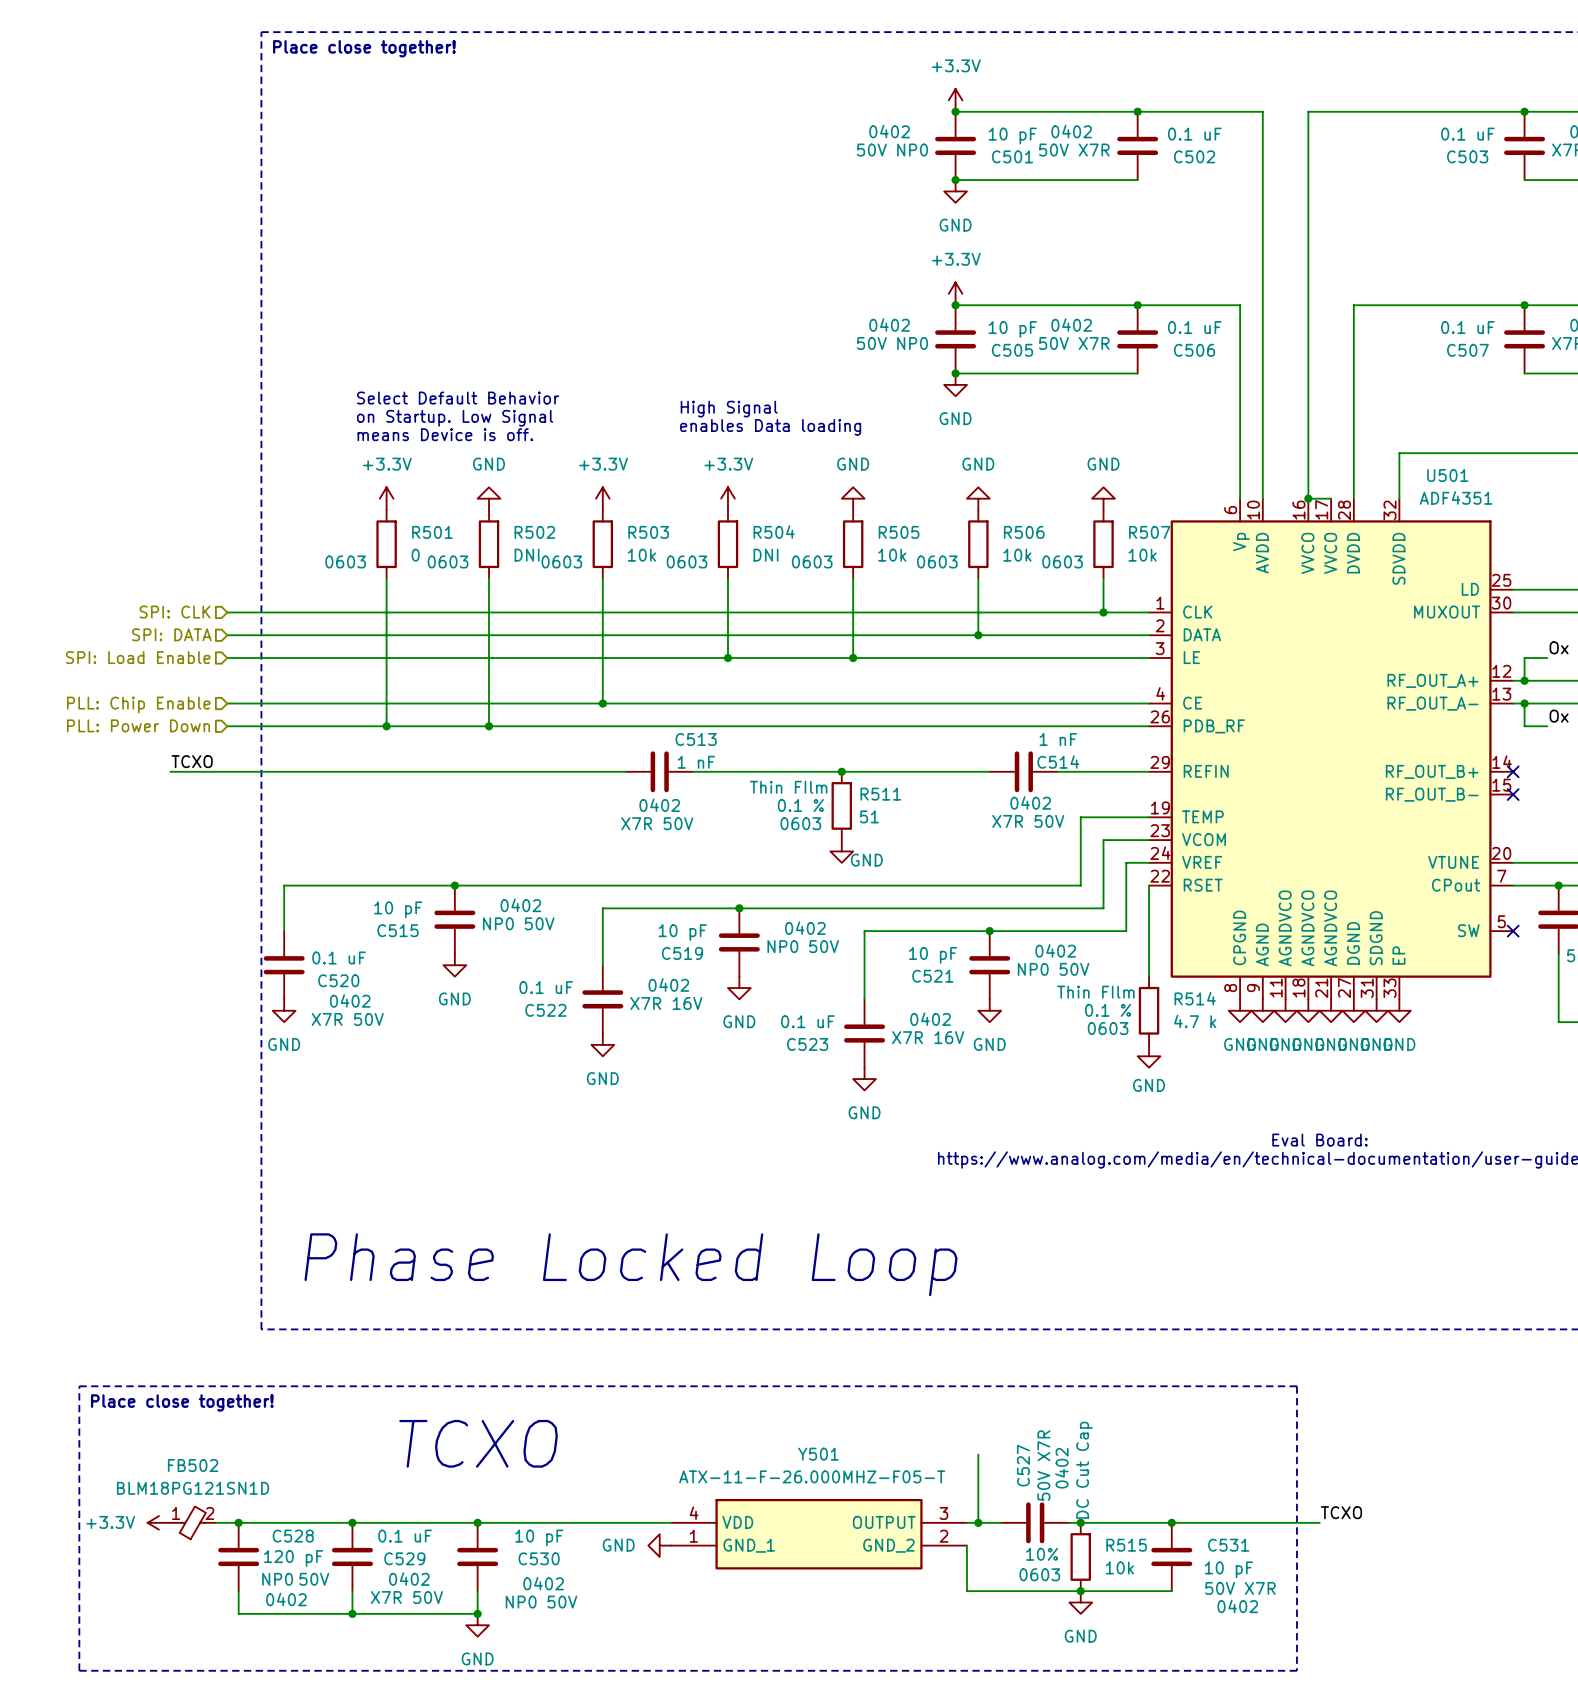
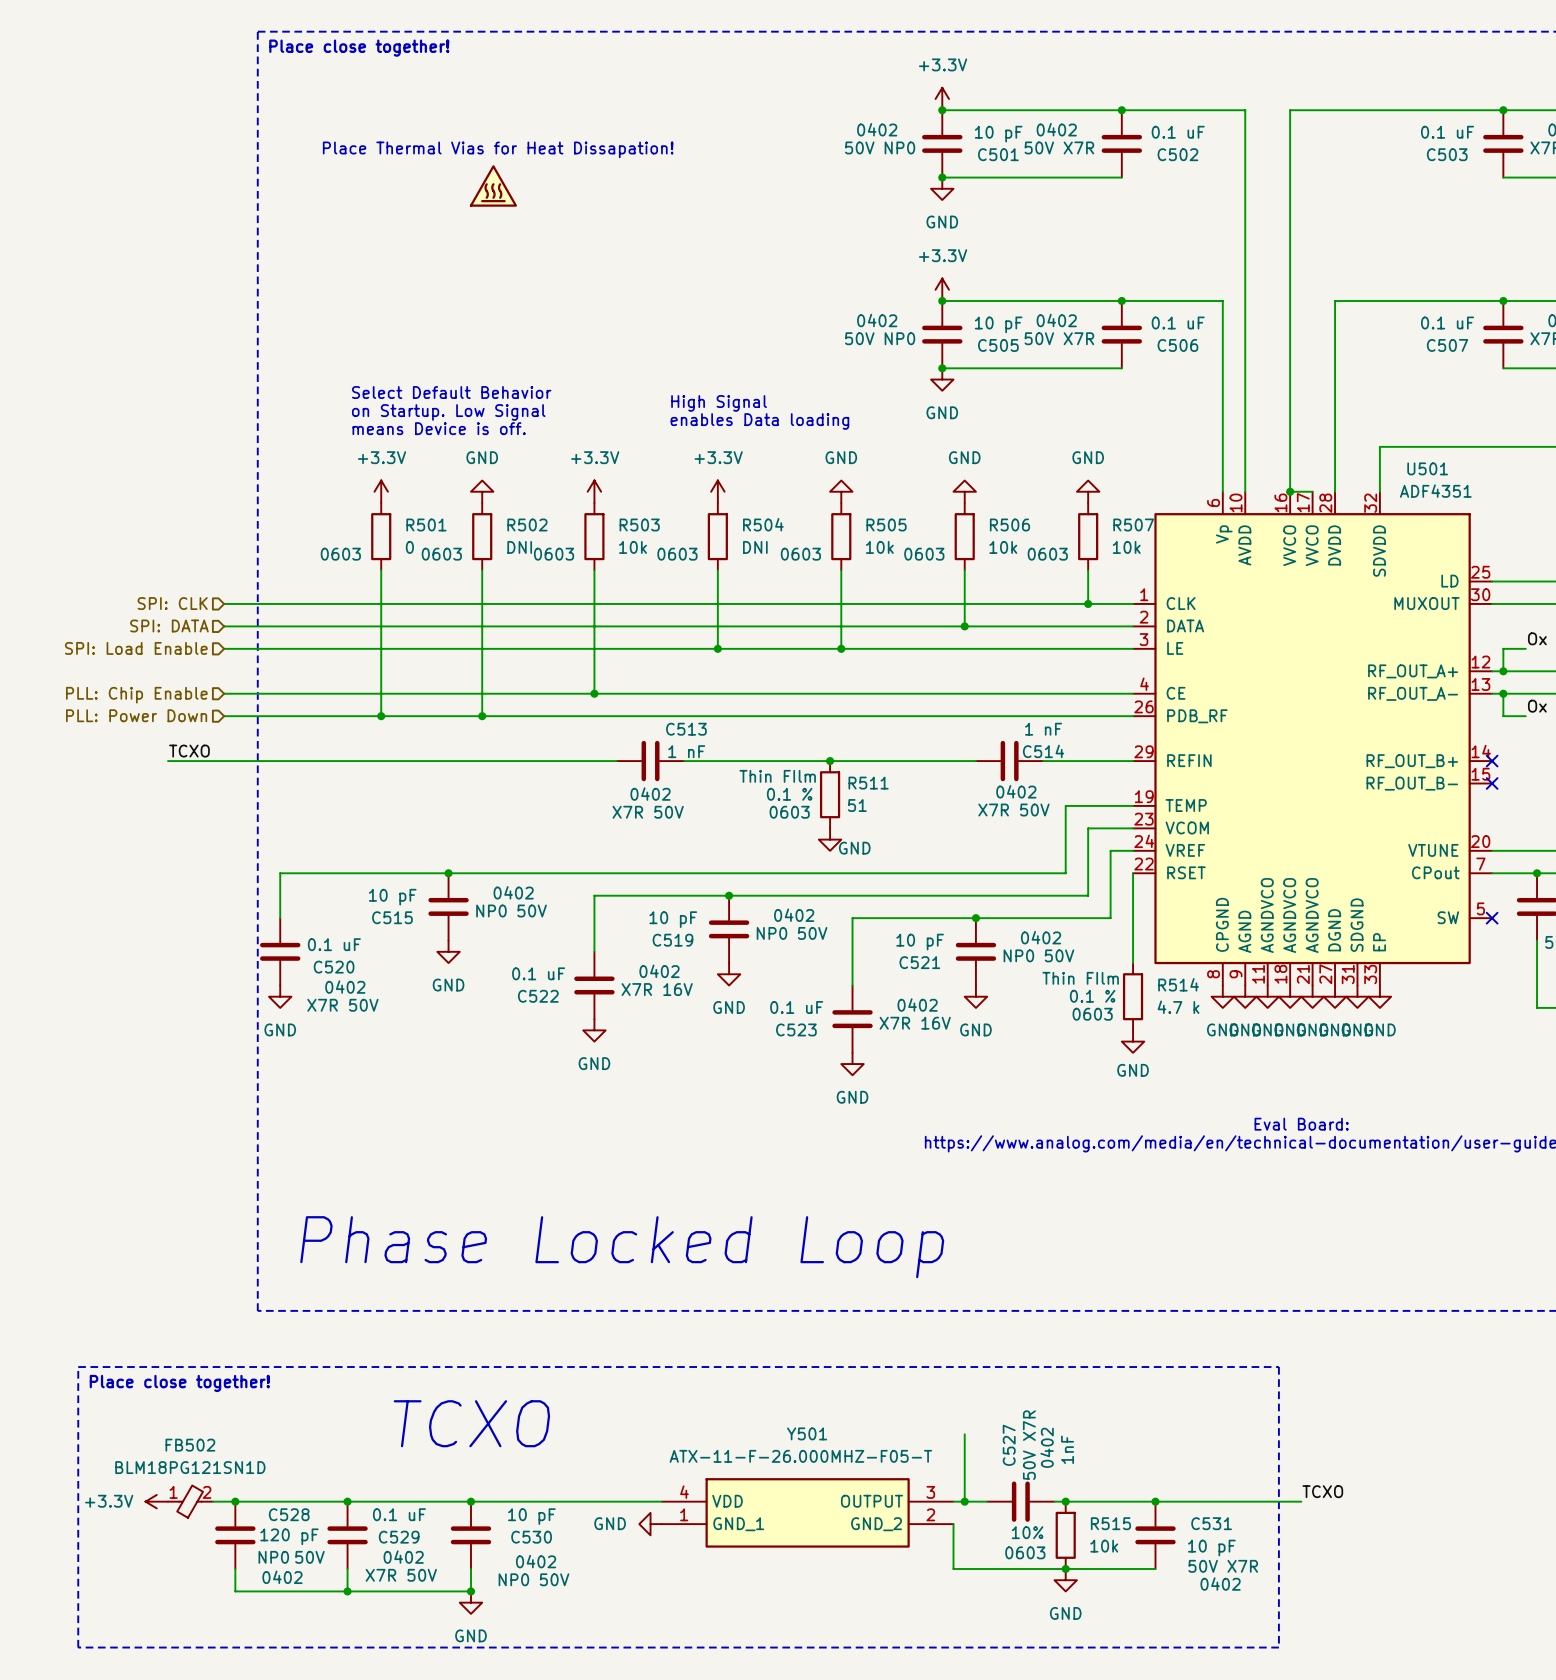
text: none -> Place Thermal Vias for Heat Dissapation! (498, 149)
power symbol: none -> (493, 185)
C527 value: DC Cut Cap (1084, 1470) -> 1nF (1067, 1449)

